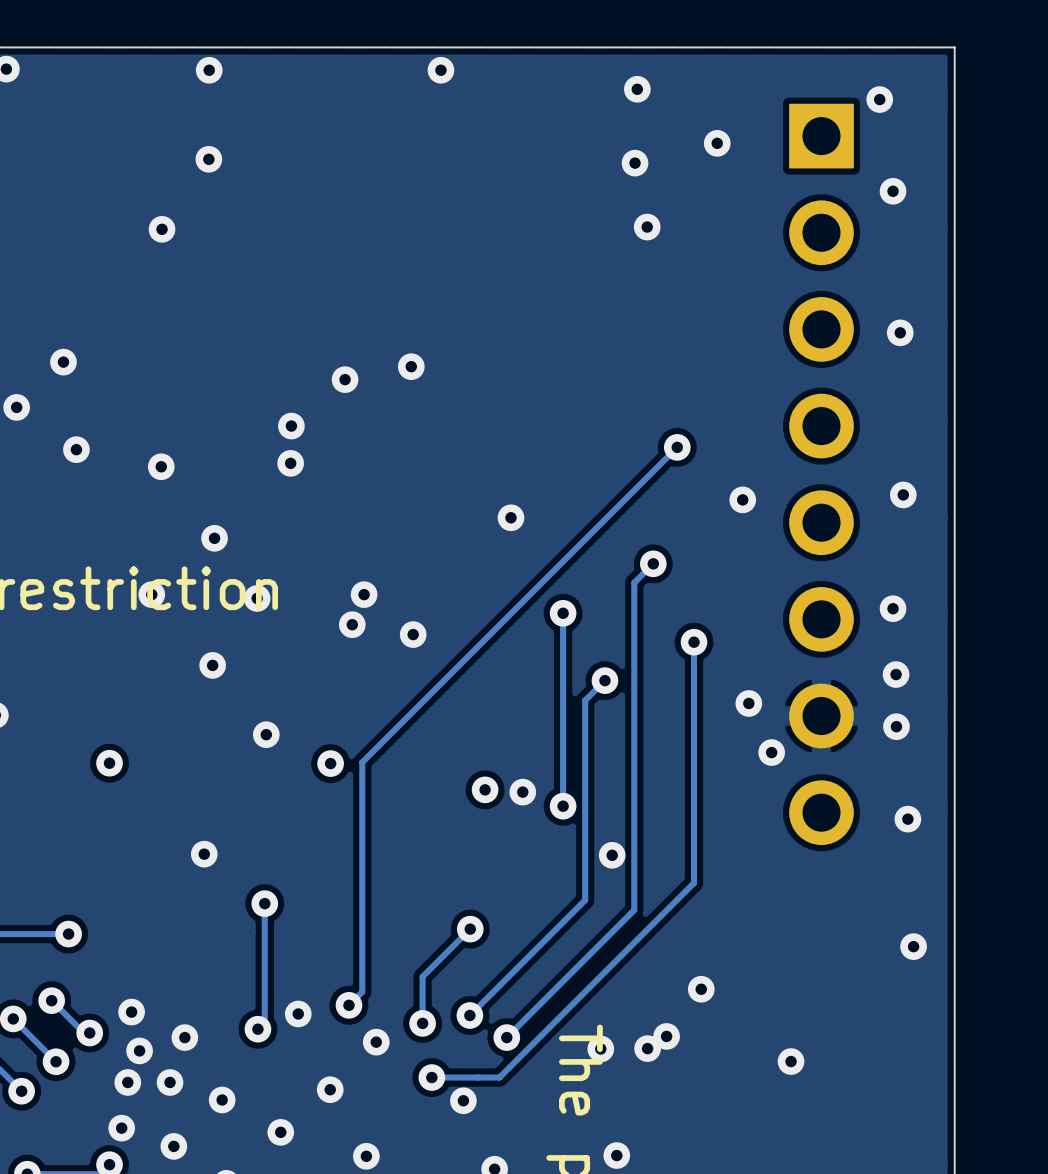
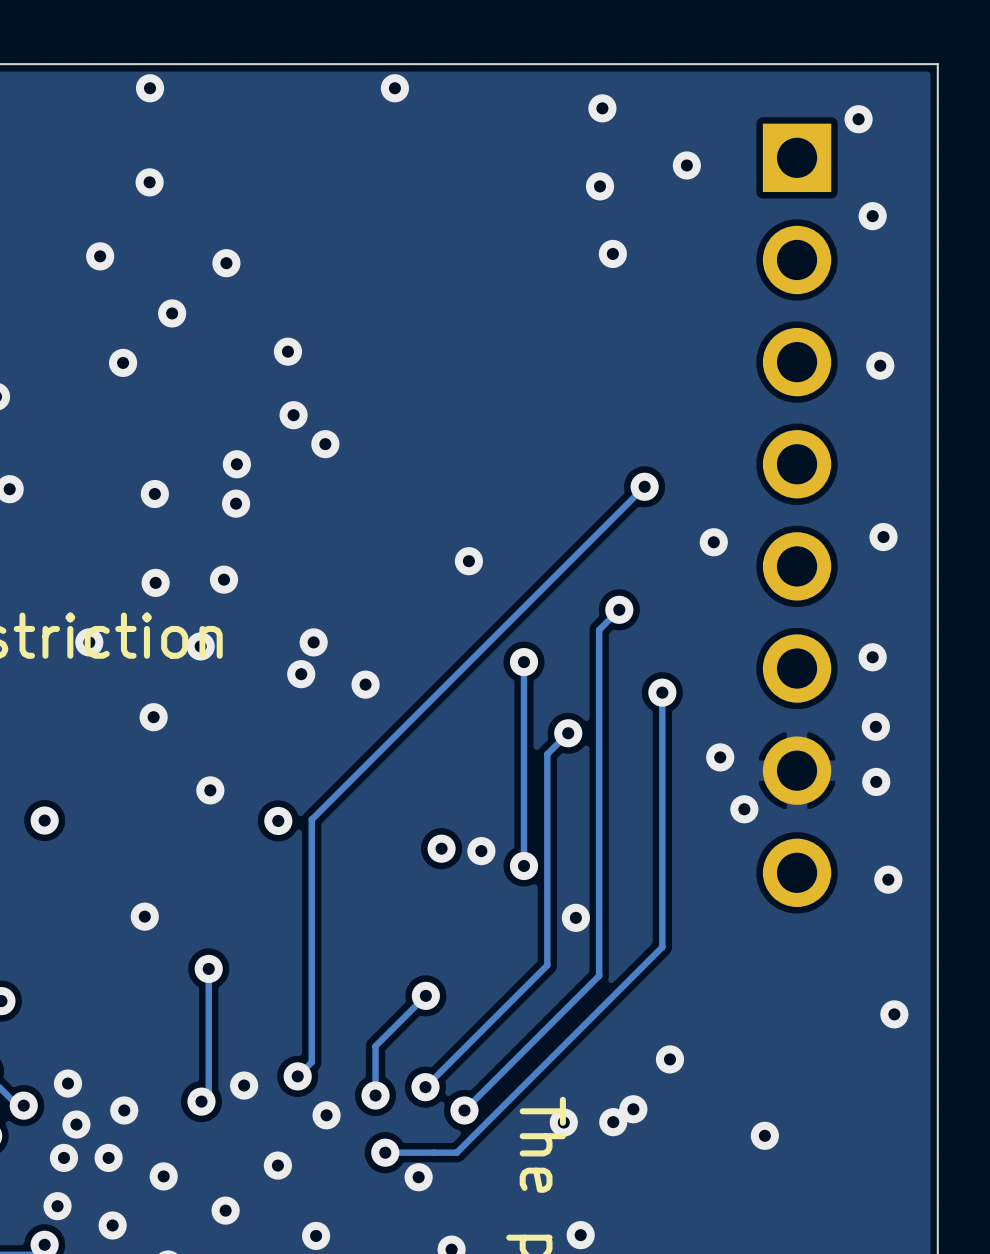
via: none -> (226, 263)
via: none -> (172, 313)
via: none -> (287, 351)
via: none -> (123, 362)
via: (411, 366) -> none
via: none -> (325, 444)
via position: (161, 466) -> (154, 494)
via: none -> (224, 579)

